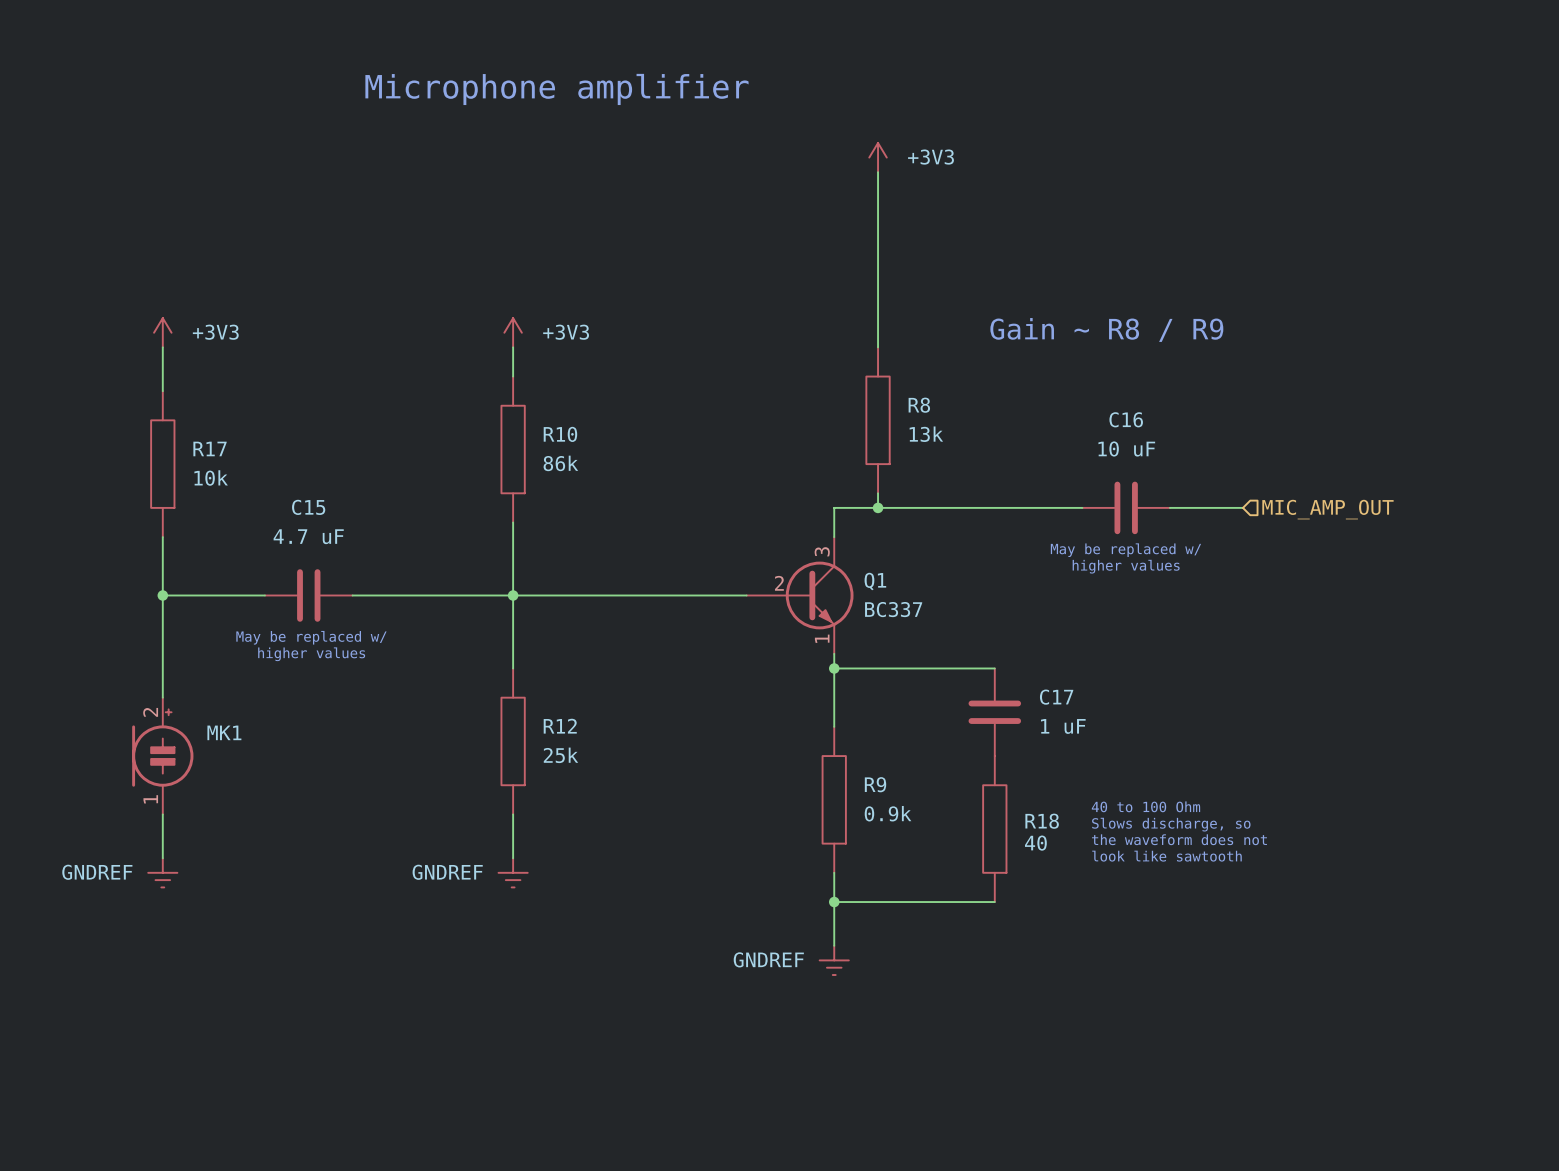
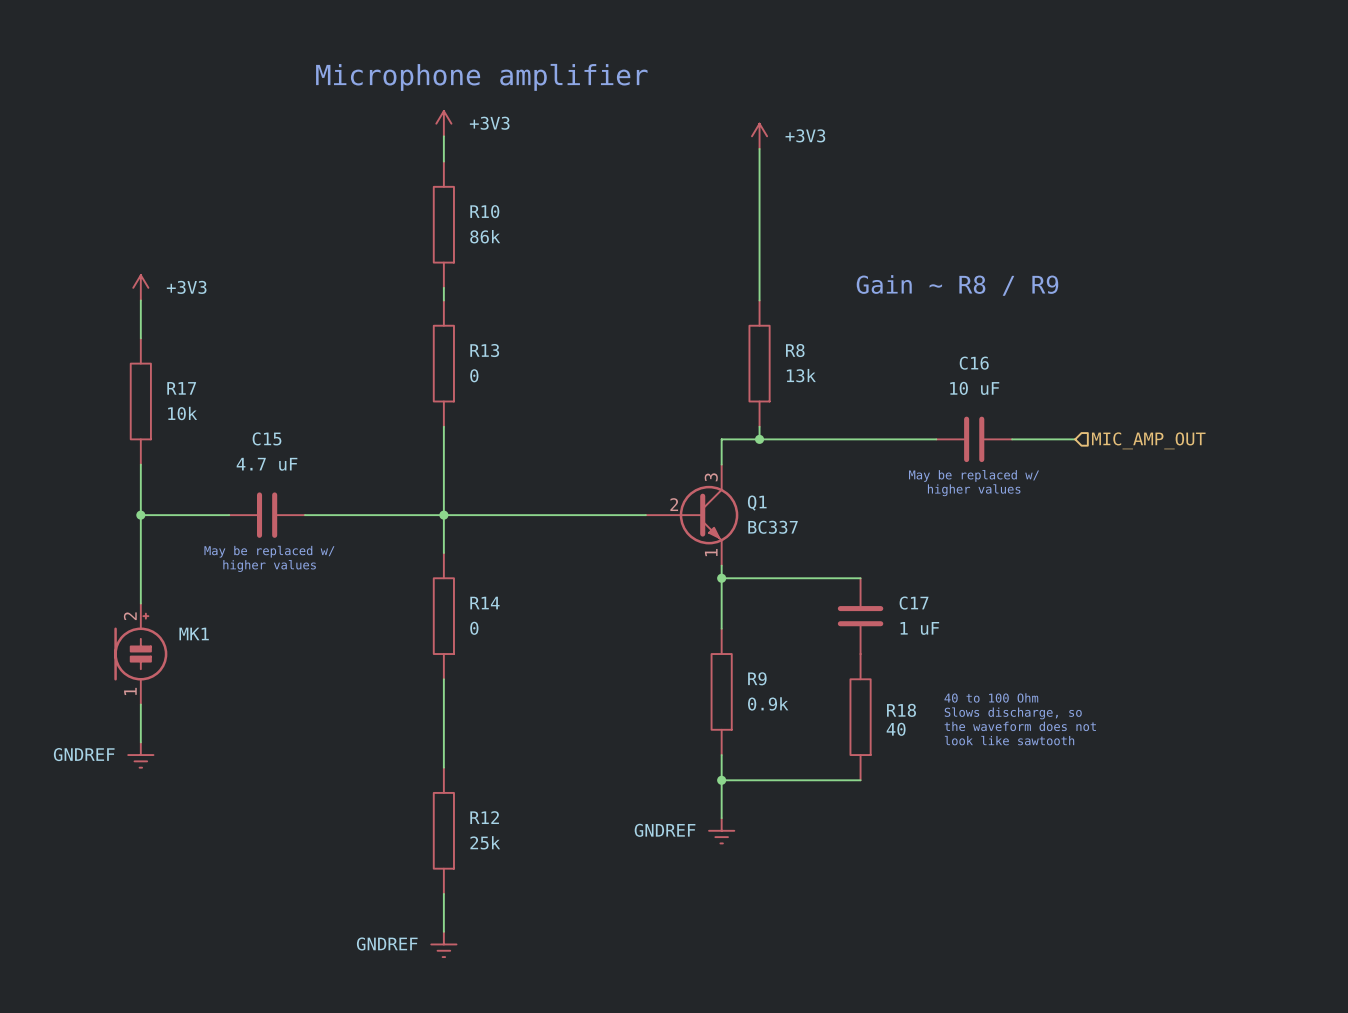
wire: none -> (443, 136) (443, 161)
power symbol position: +3V3 (513, 332) -> +3V3 (443, 123)
R13: none -> 0 (443, 363)
R10 position: (513, 449) -> (443, 224)
R14: none -> 0 (443, 616)
R12 position: (513, 741) -> (443, 830)
power symbol position: GNDREF (513, 872) -> GNDREF (443, 944)
wire: none -> (443, 893) (443, 931)

